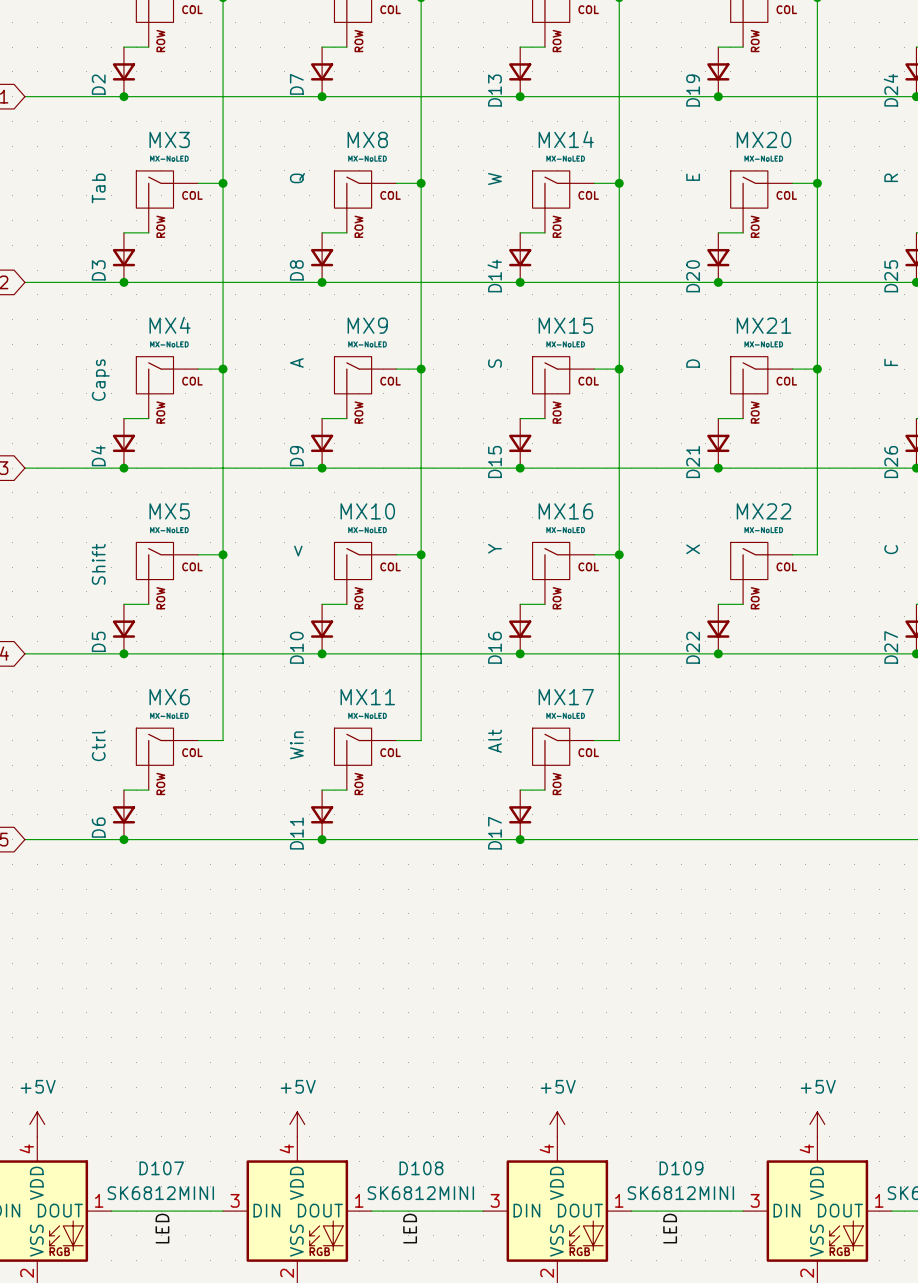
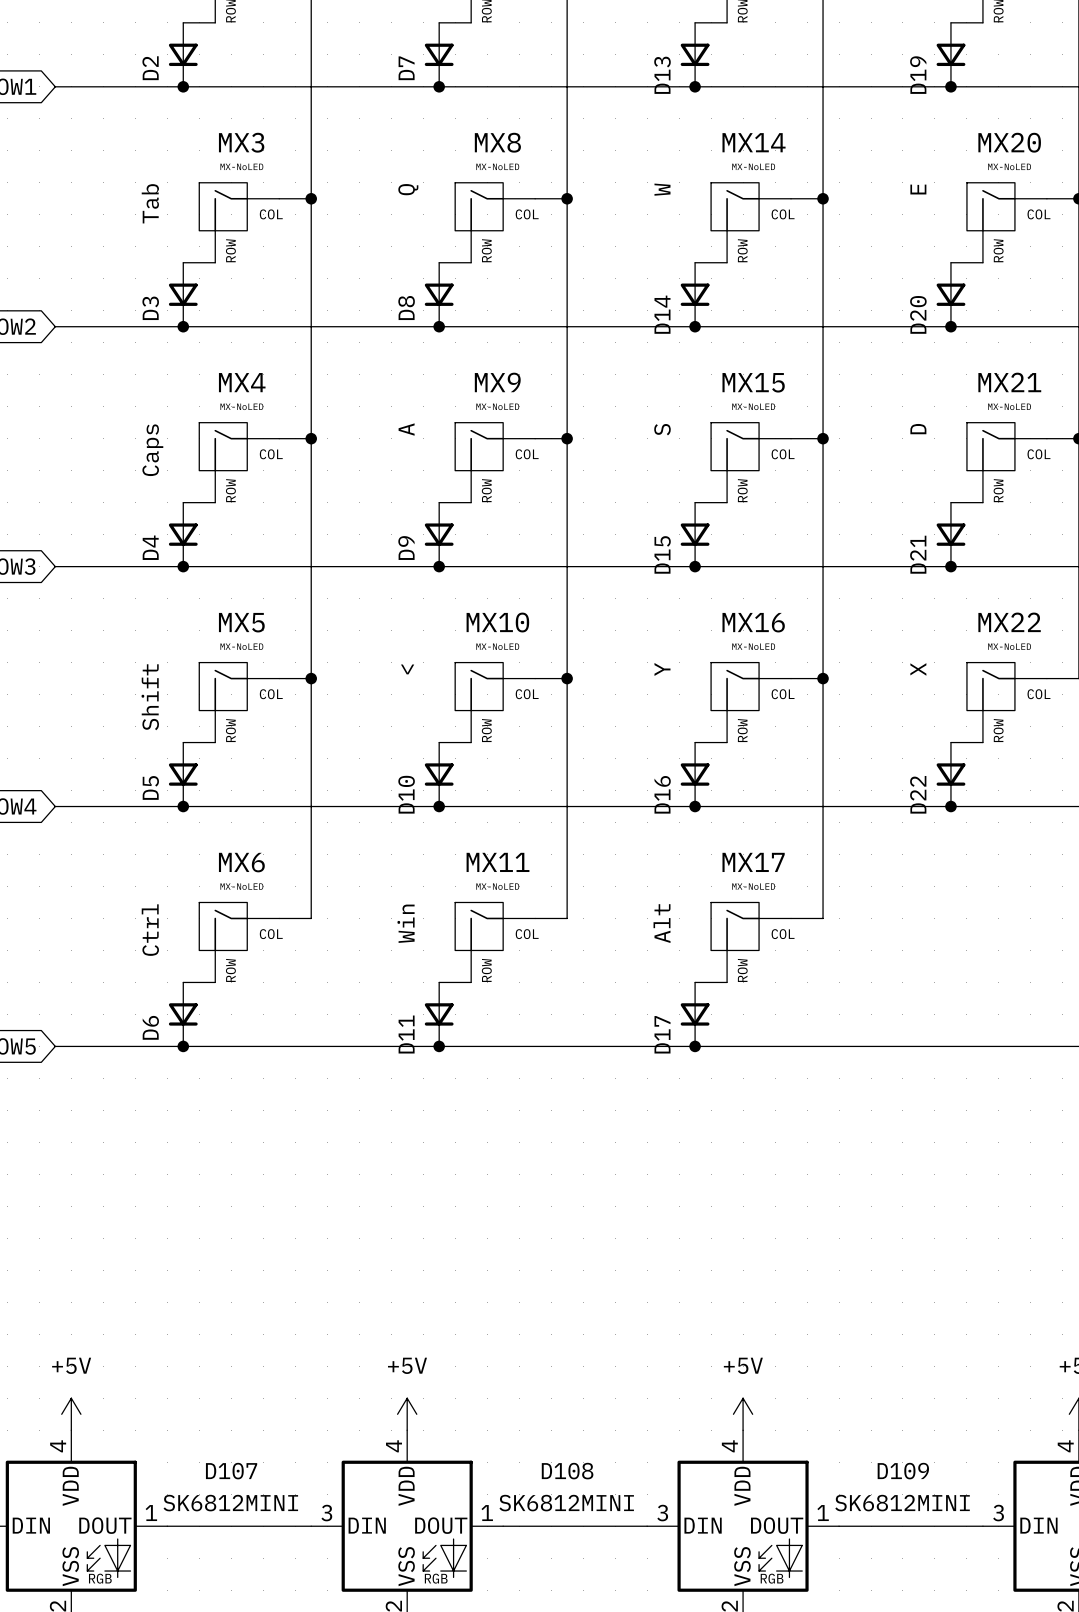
label: LED (162, 1228) -> none
label: LED (410, 1228) -> none
label: LED (670, 1228) -> none

